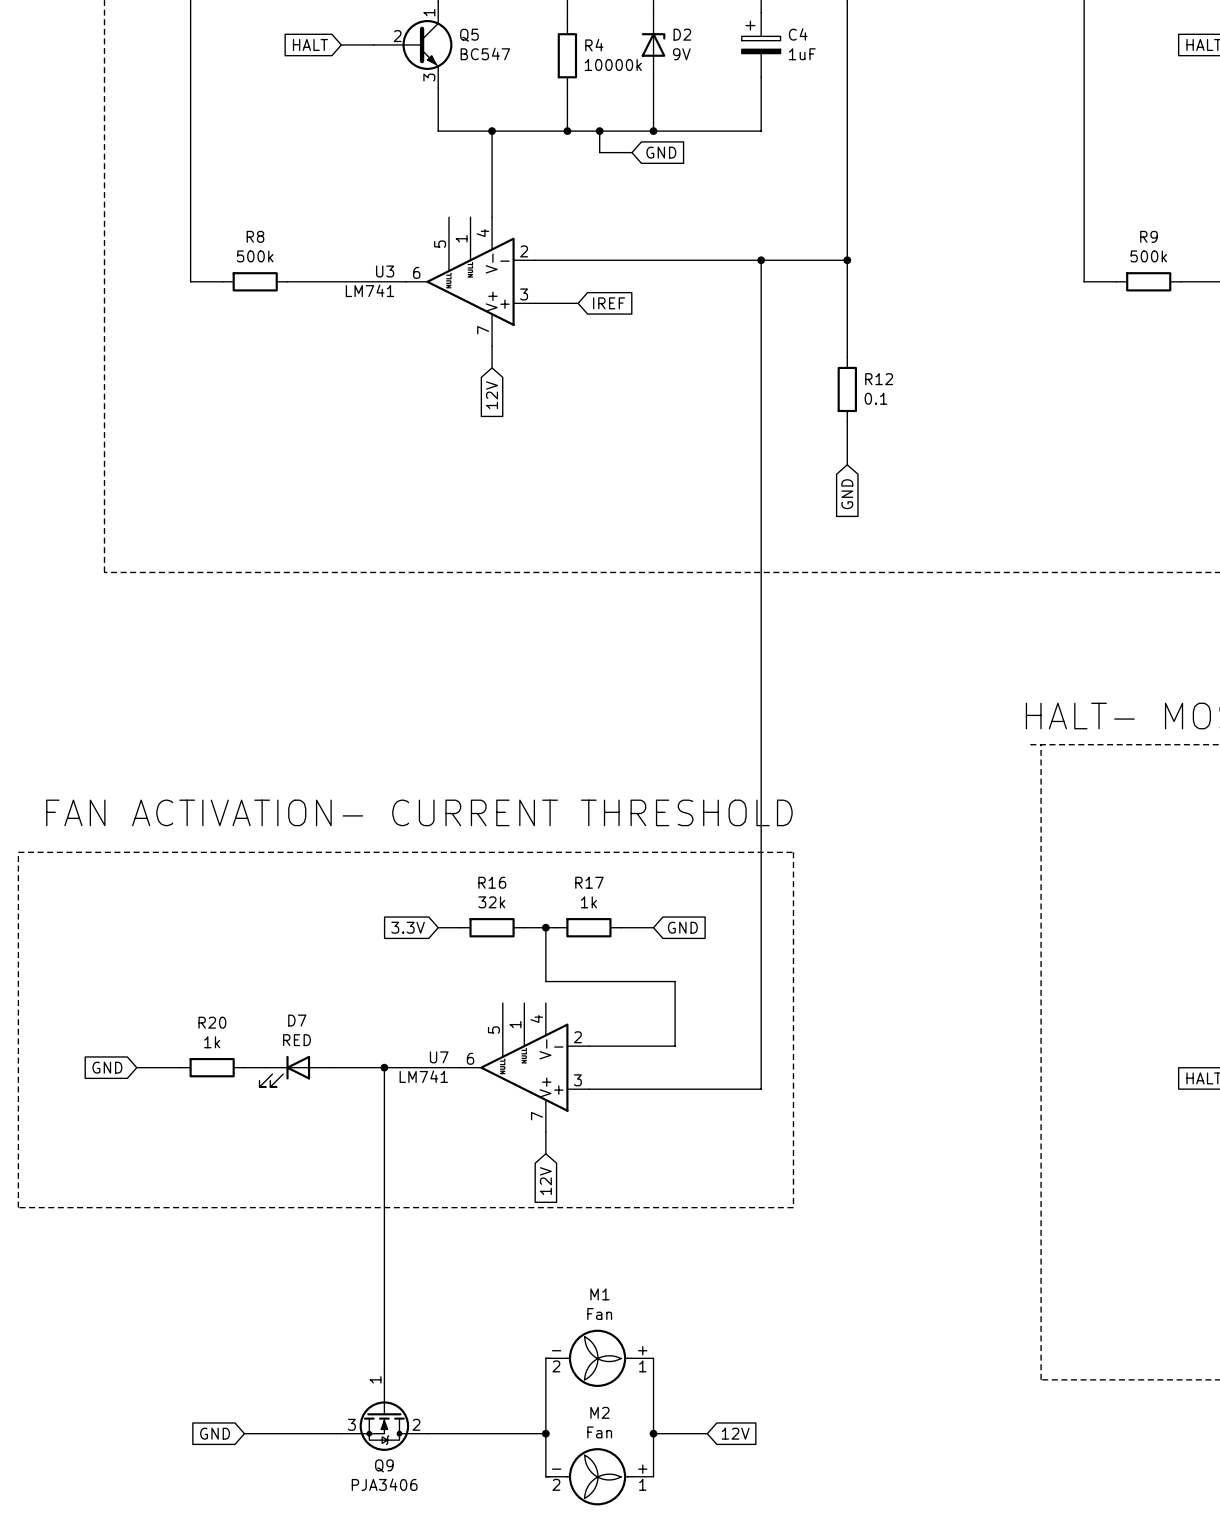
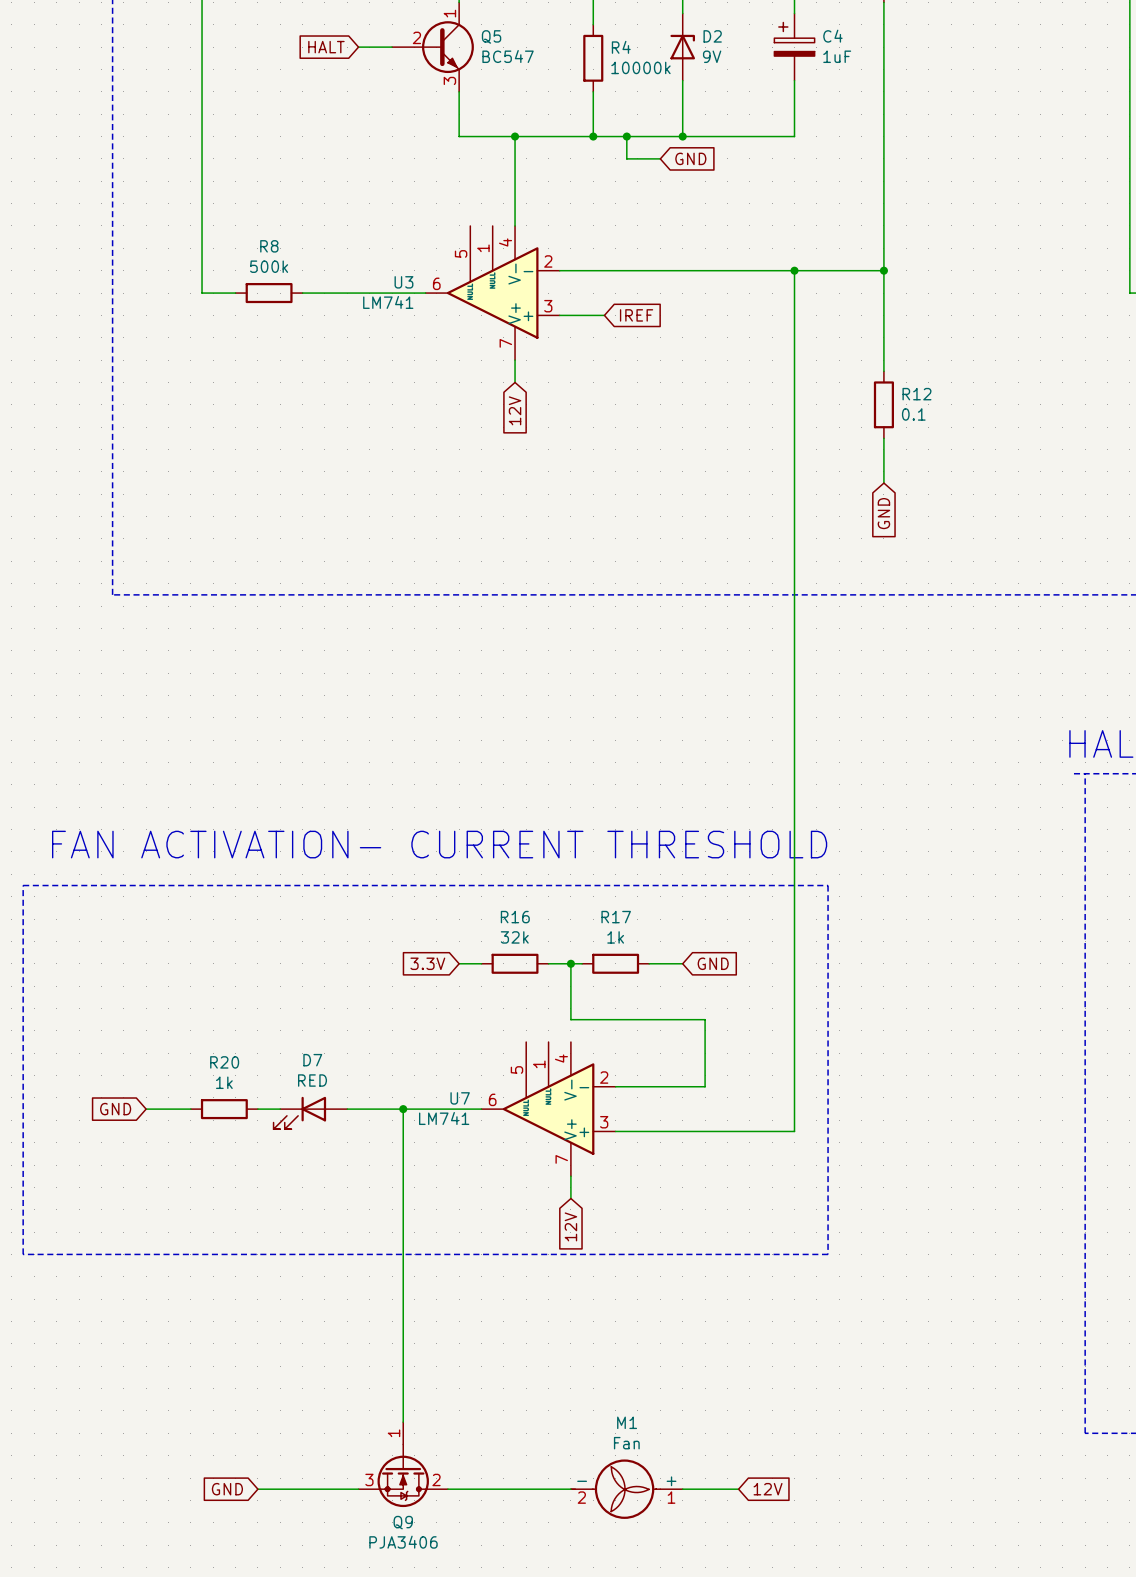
wire: (545, 1358) (545, 1476) -> none
M1 position: (599, 1358) -> (626, 1489)
wire: (653, 1358) (653, 1476) -> none
junction: (545, 1433) -> none
junction: (653, 1433) -> none
M2: Fan (599, 1476) -> none

